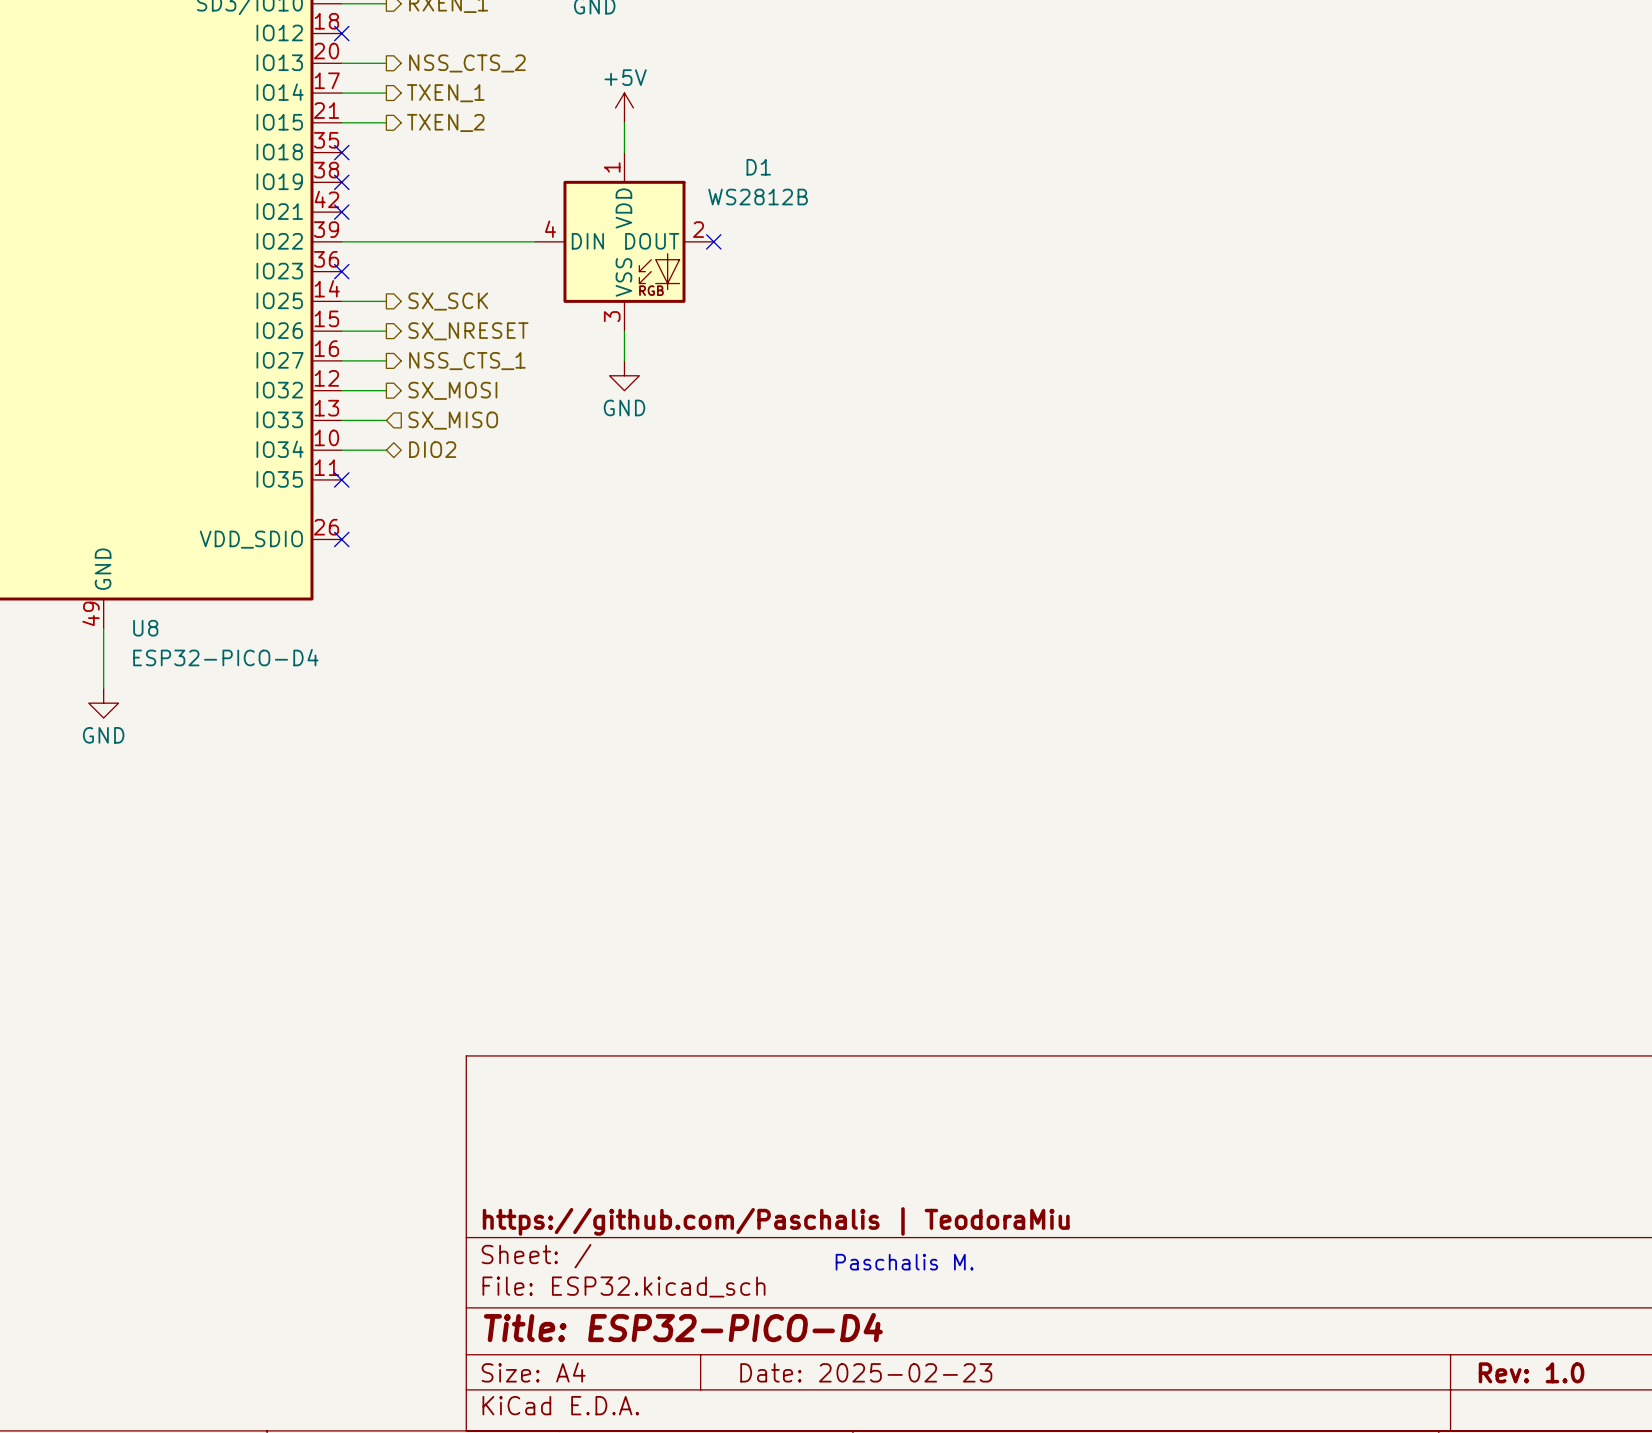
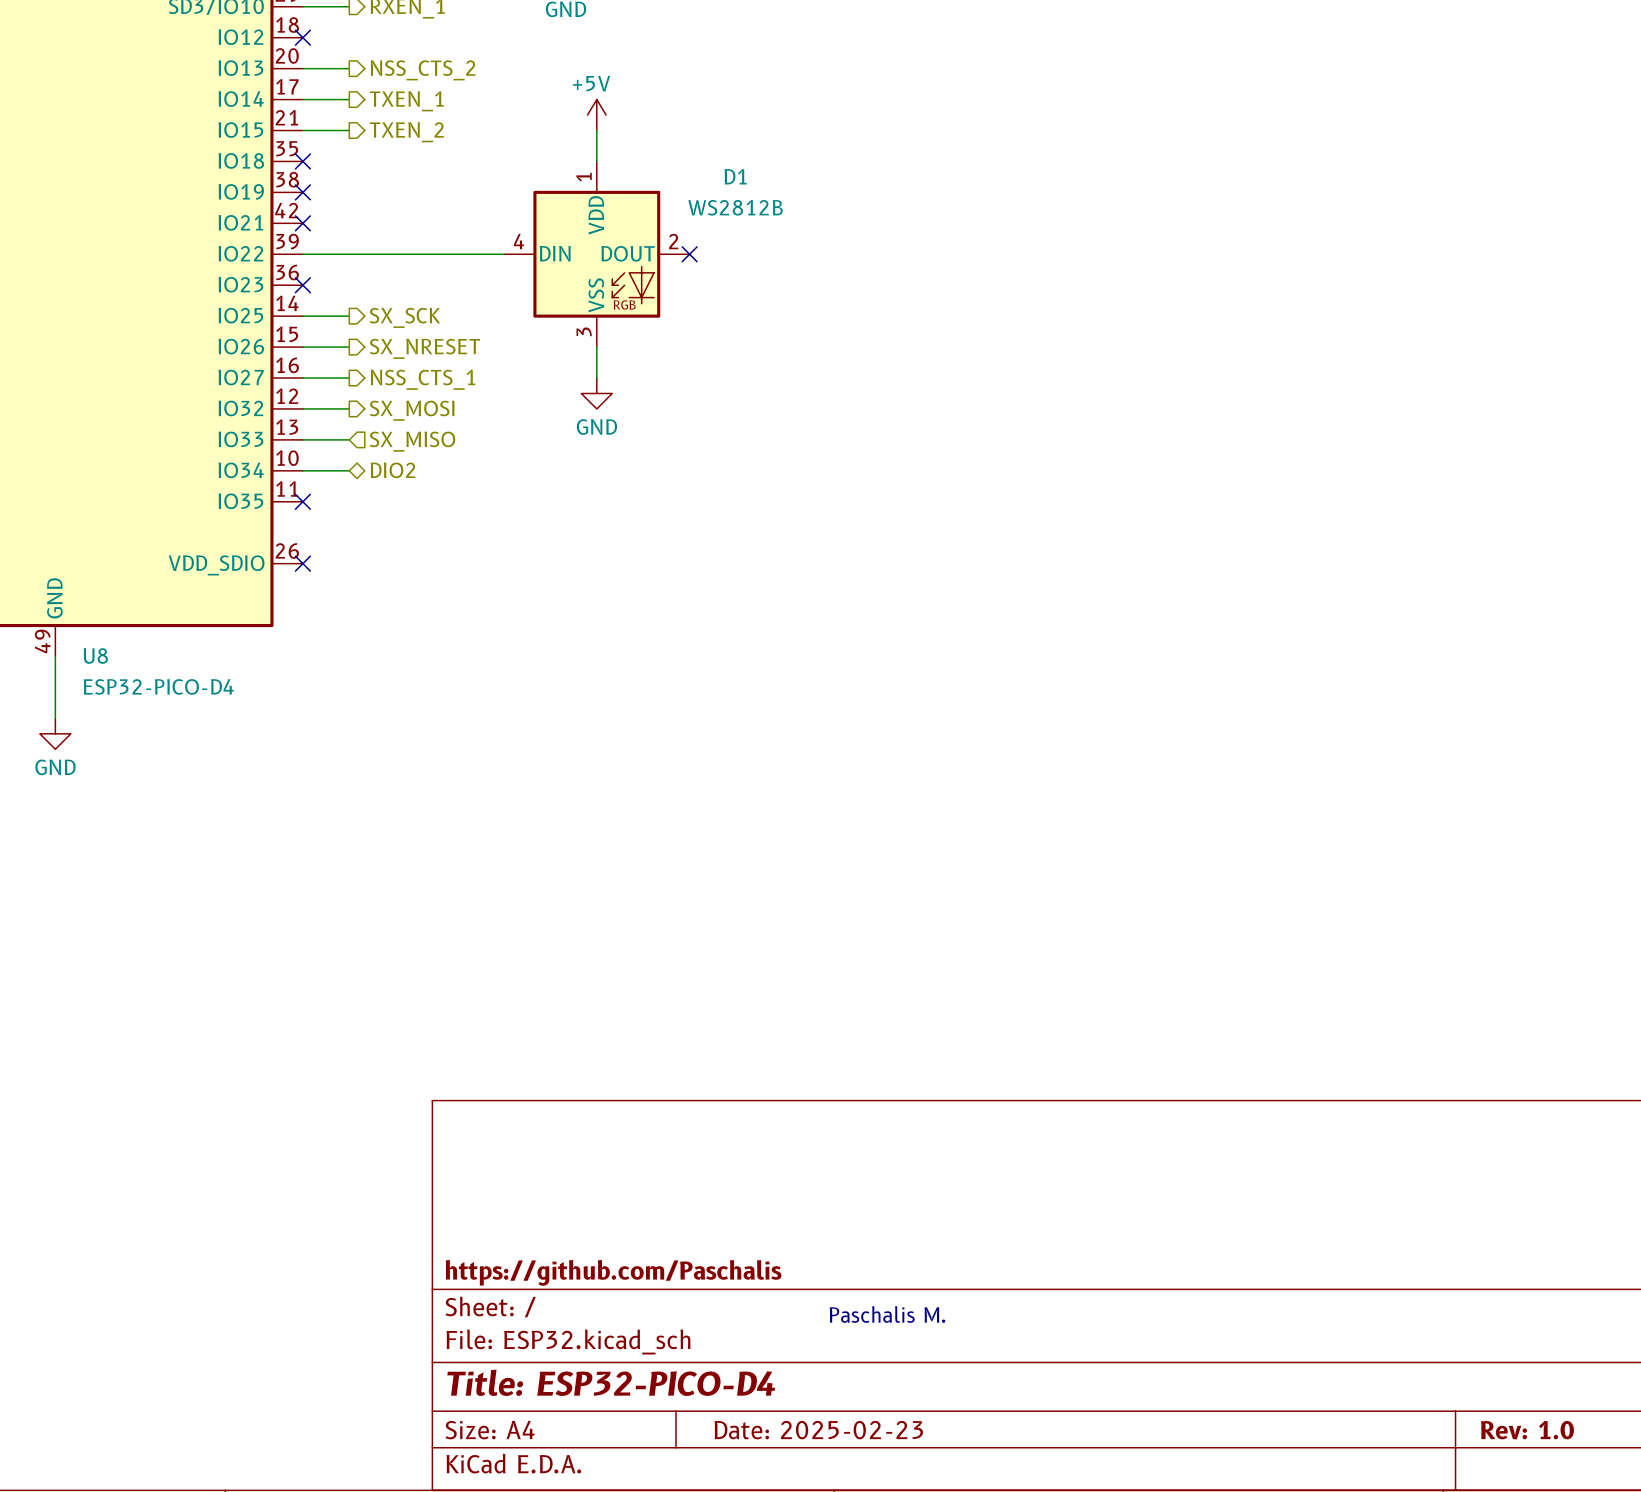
title block: https://github.com/Paschalis | TeodoraMiu (776, 1221) -> https://github.com/Paschalis (613, 1272)

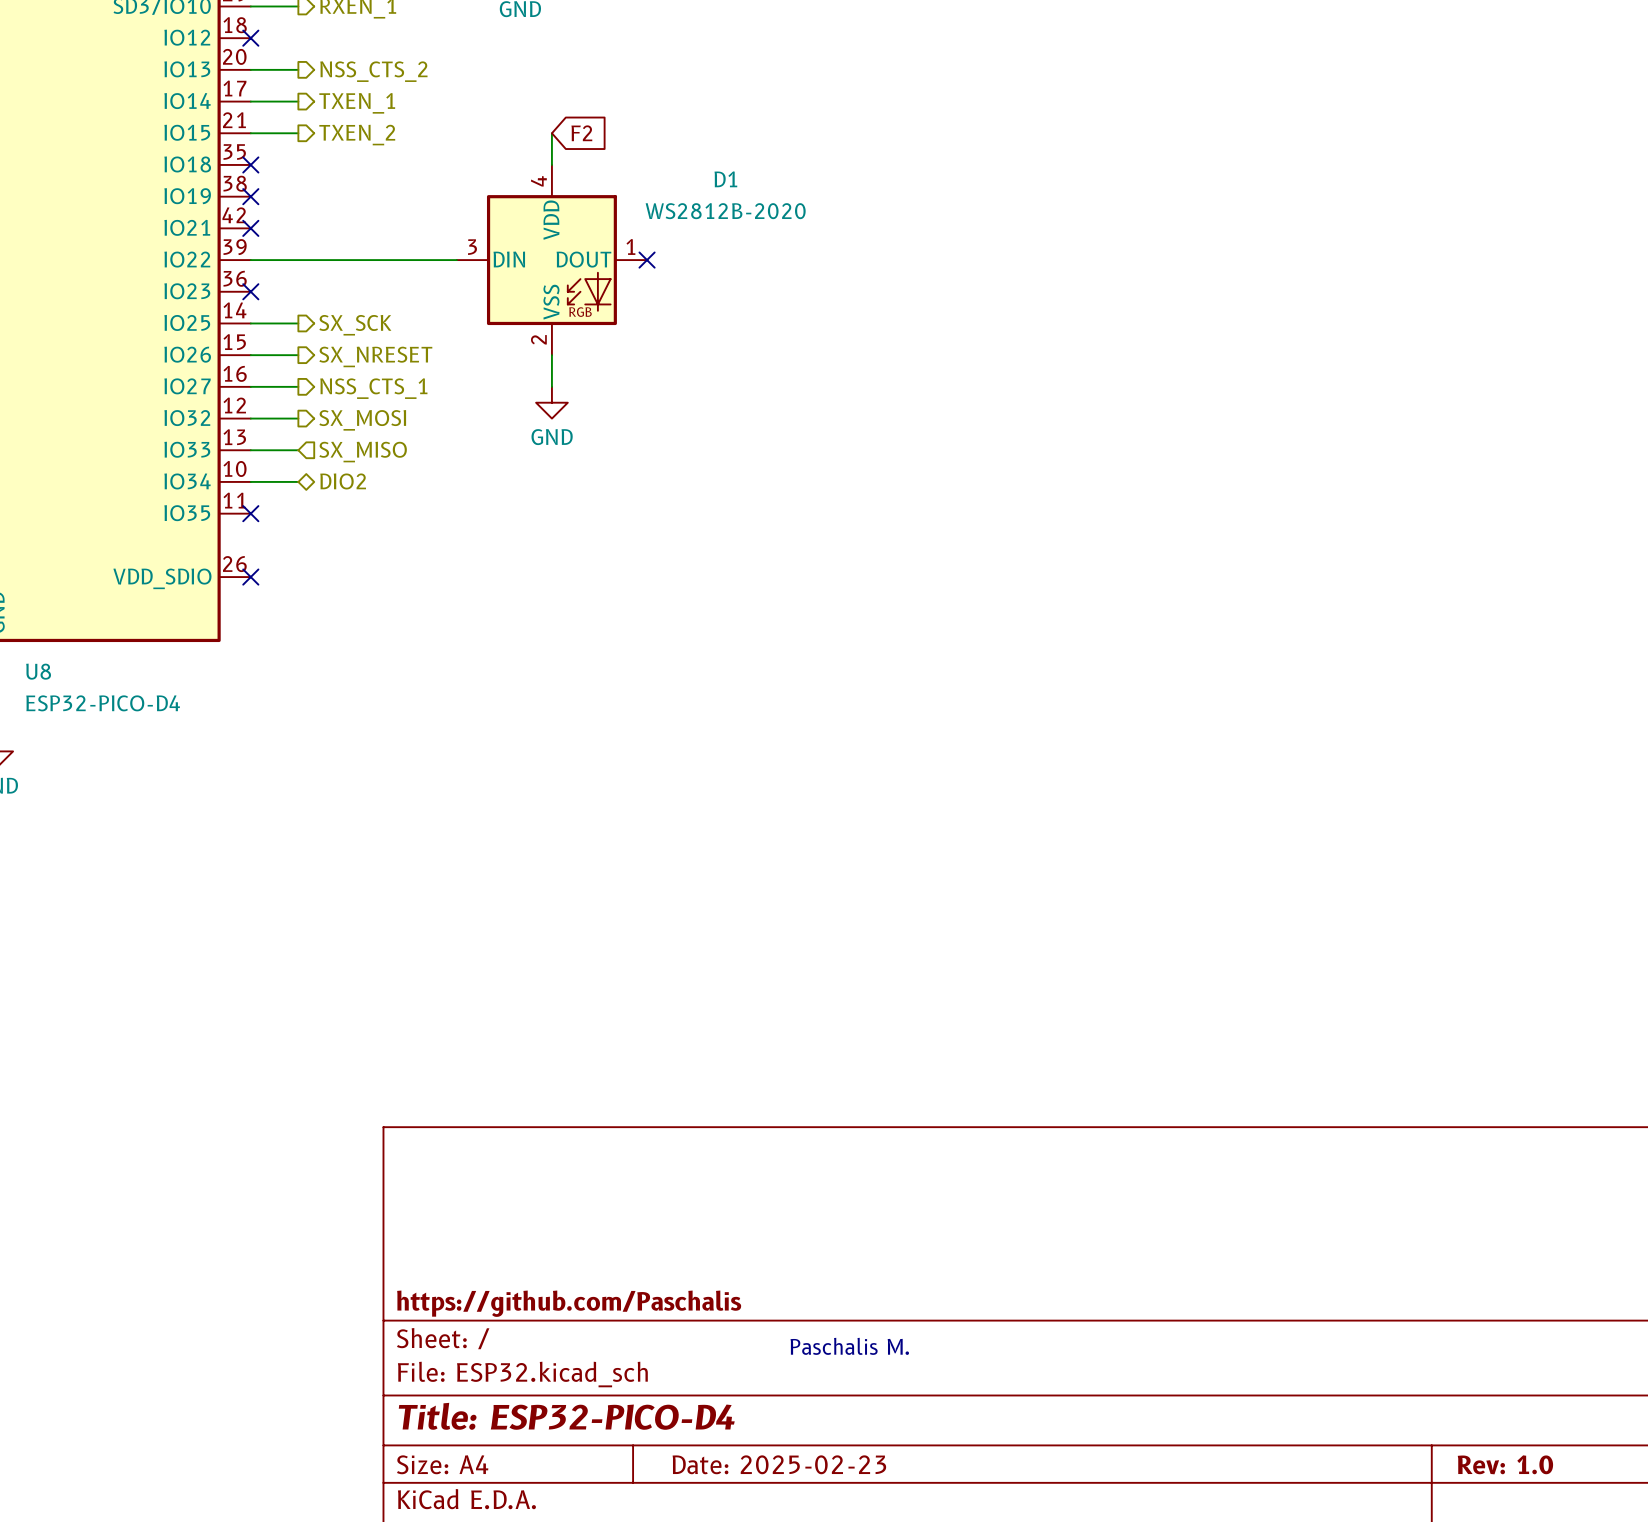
power symbol: +5V (596, 115) -> none
global label: none -> F2 (581, 133)
D1 name position: D1 (735, 176) -> D1 (725, 179)
D1 pin number: 1 (584, 177) -> 4 (538, 181)
D1 value: WS2812B (735, 207) -> WS2812B-2020 (725, 211)
D1 pin number: 4 (518, 241) -> 3 (472, 247)
D1 pin number: 2 (673, 241) -> 1 (630, 246)
D1 pin number: 3 (584, 331) -> 2 (538, 339)

